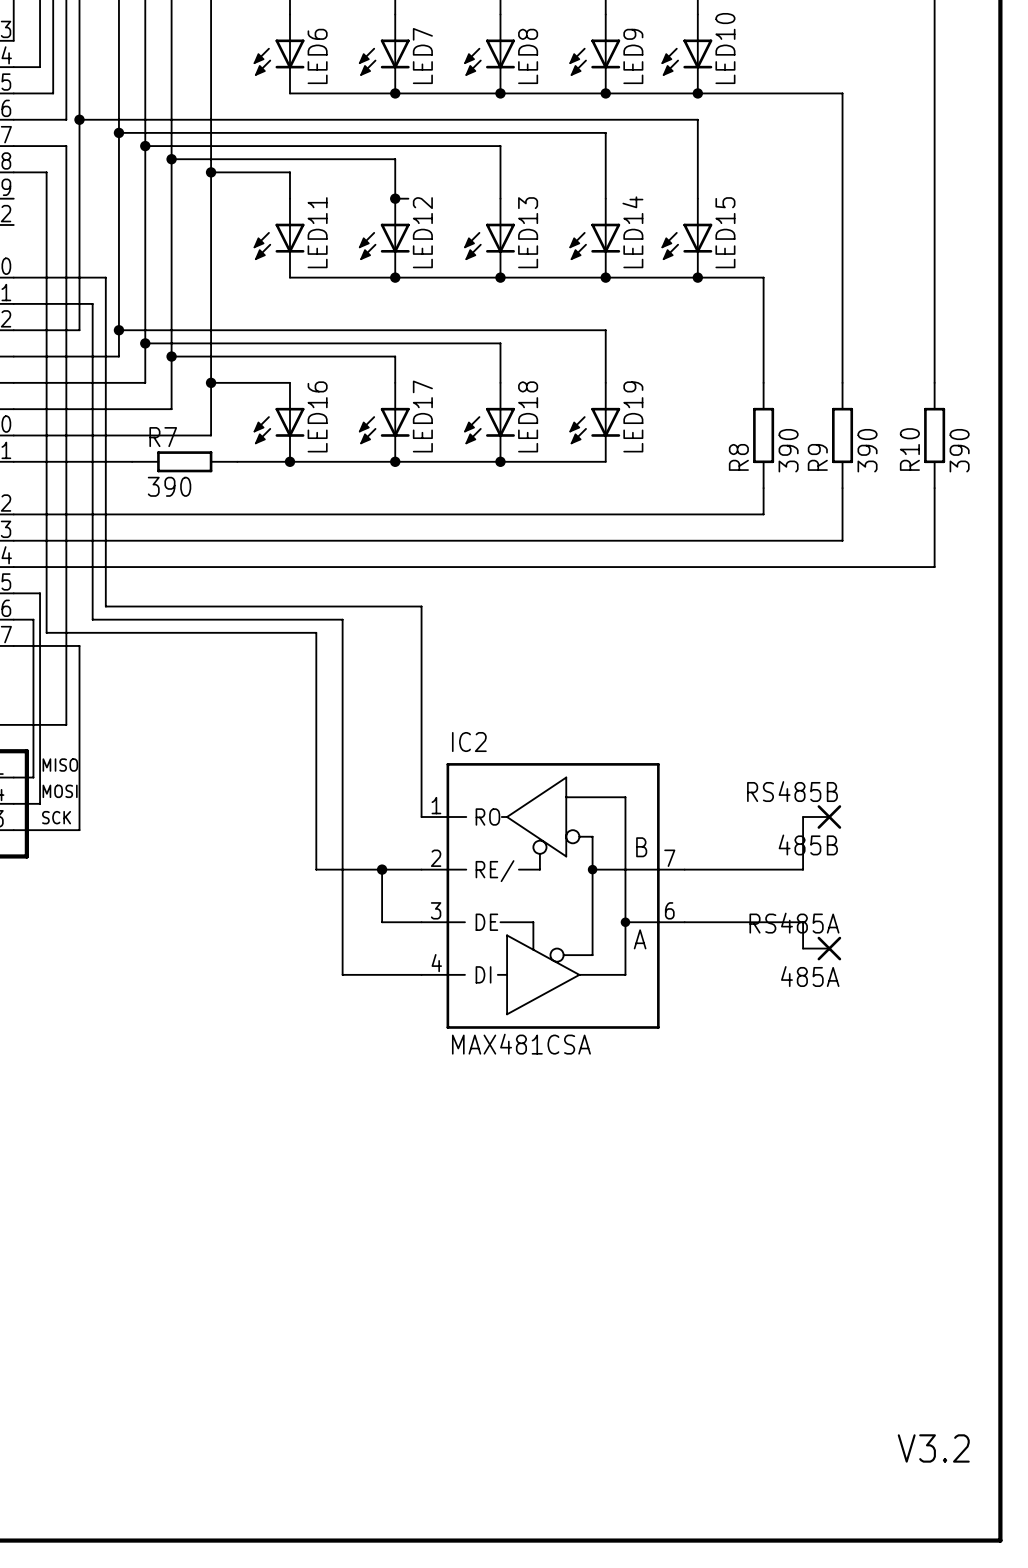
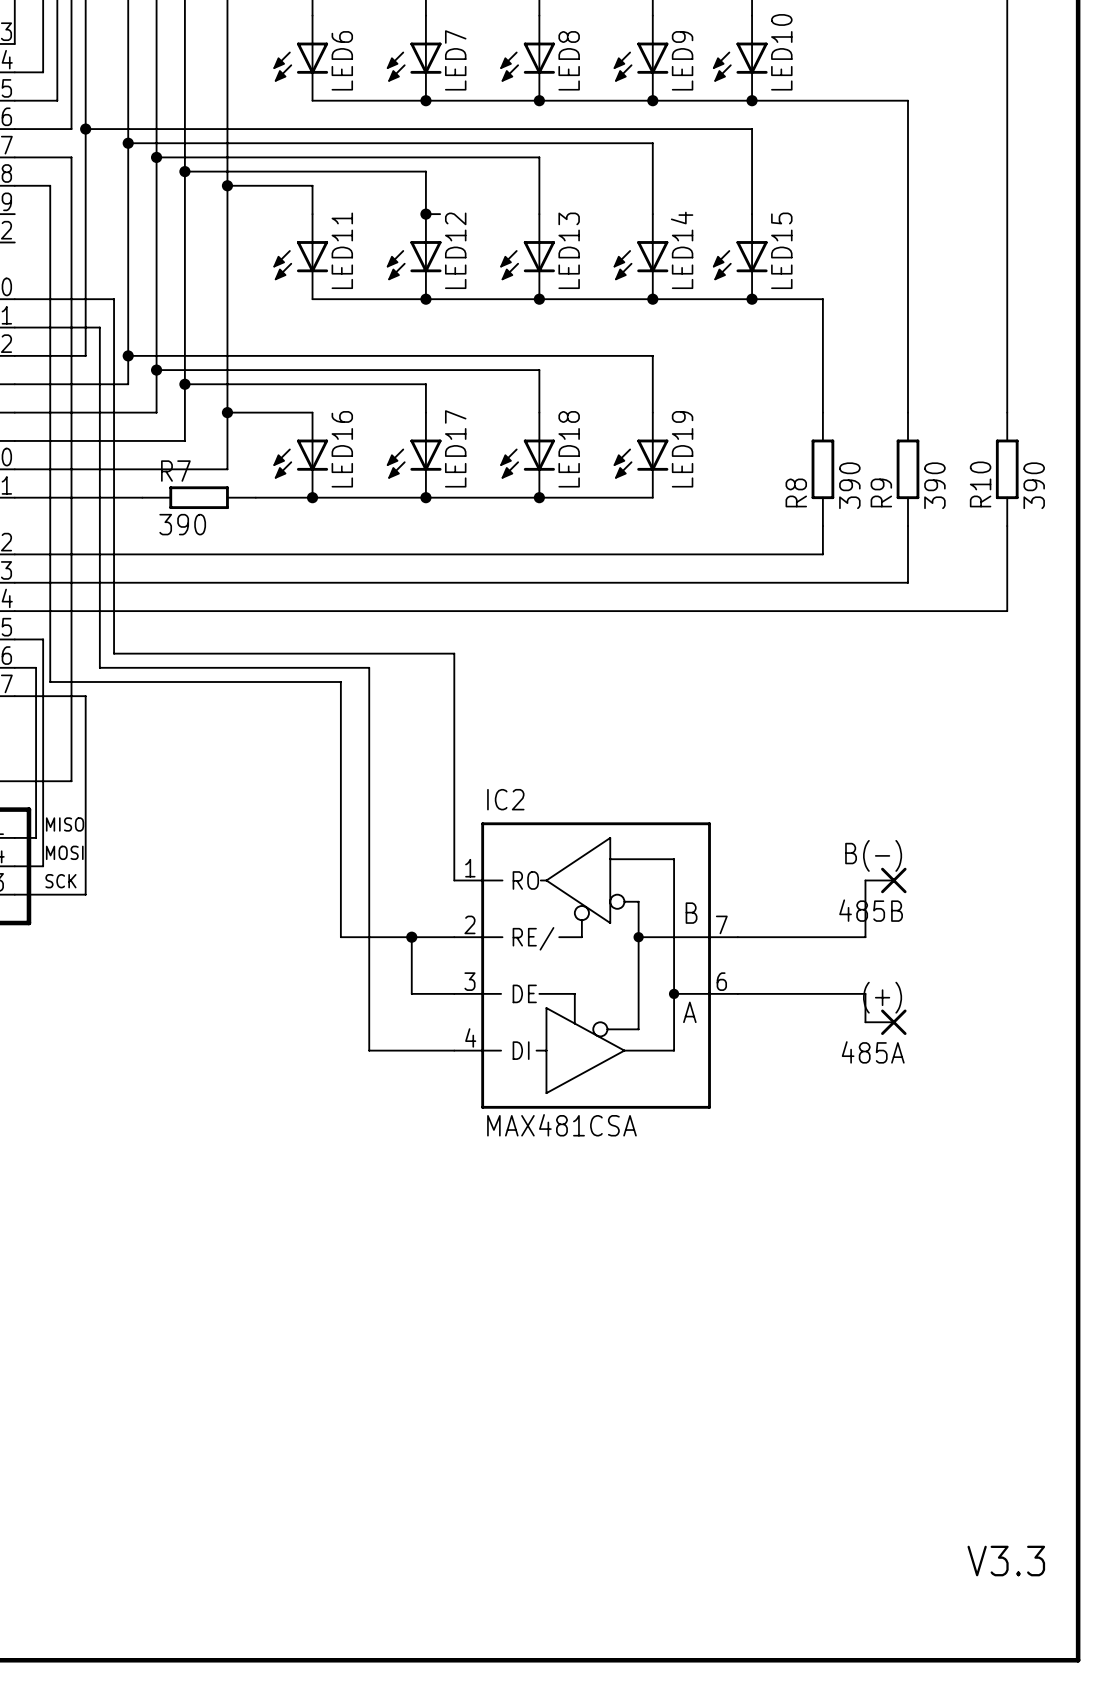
485B value: RS485B (792, 791) -> B(-) (873, 855)
485A value: RS485A (794, 923) -> (+) (882, 997)
text: V3.2 (933, 1448) -> V3.3 (1006, 1561)

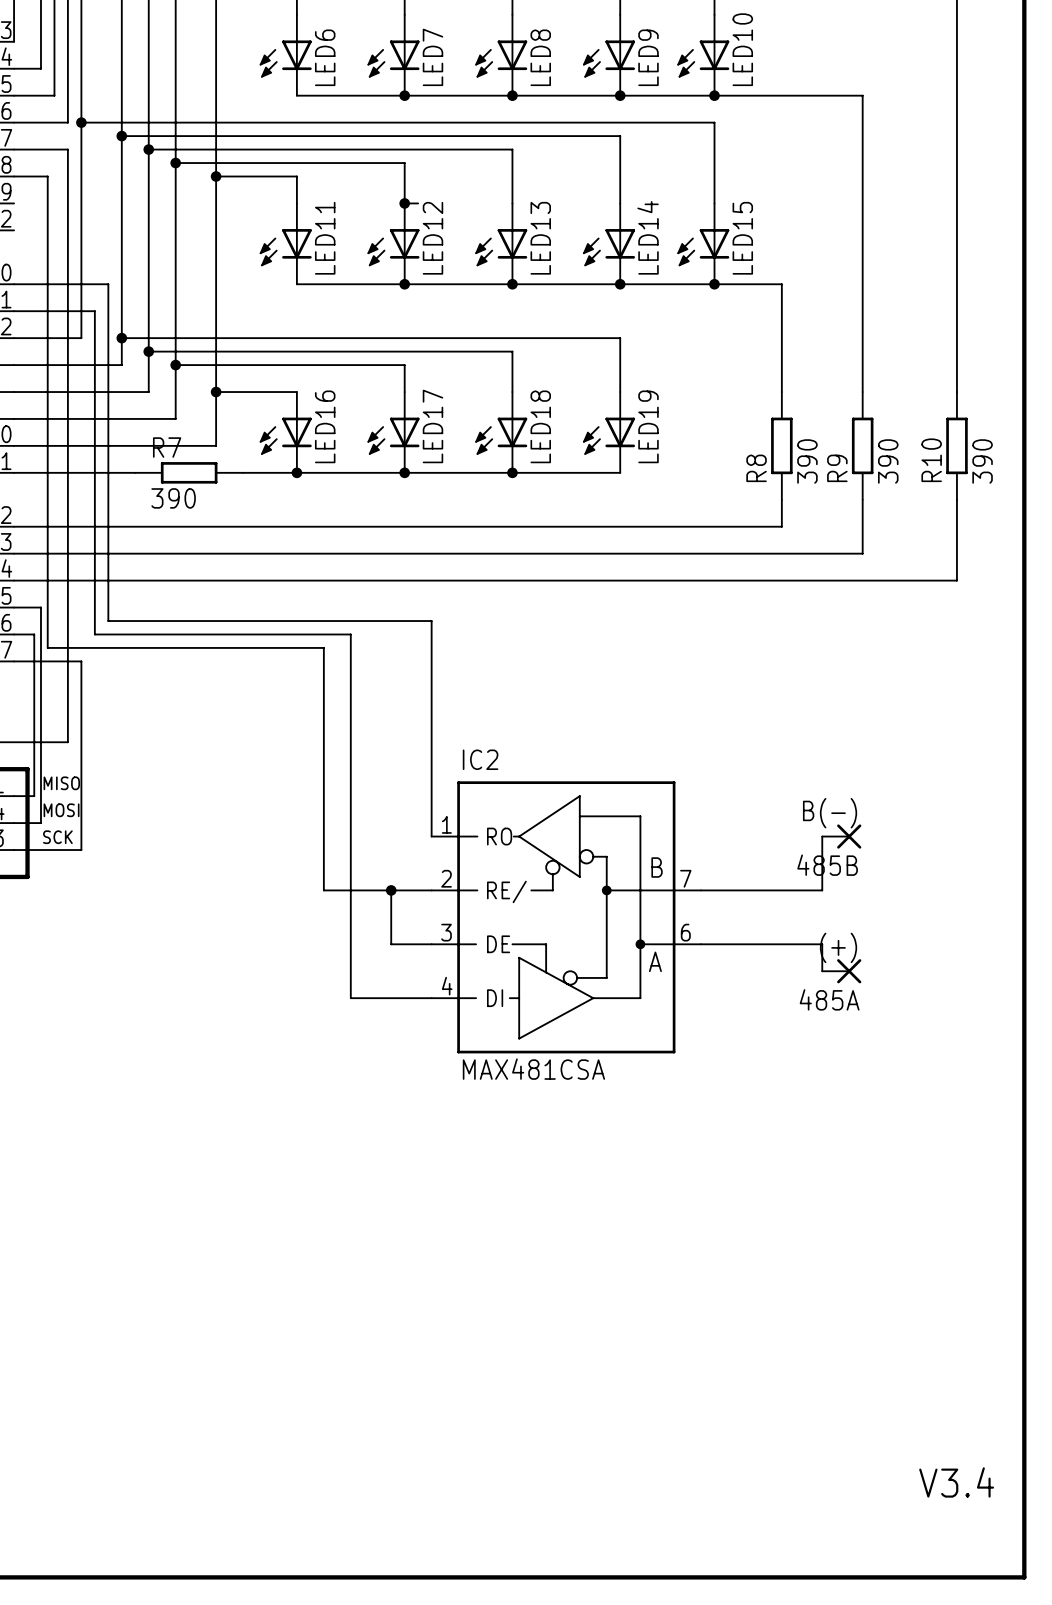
text: V3.3 (1006, 1561) -> V3.4 (956, 1482)

